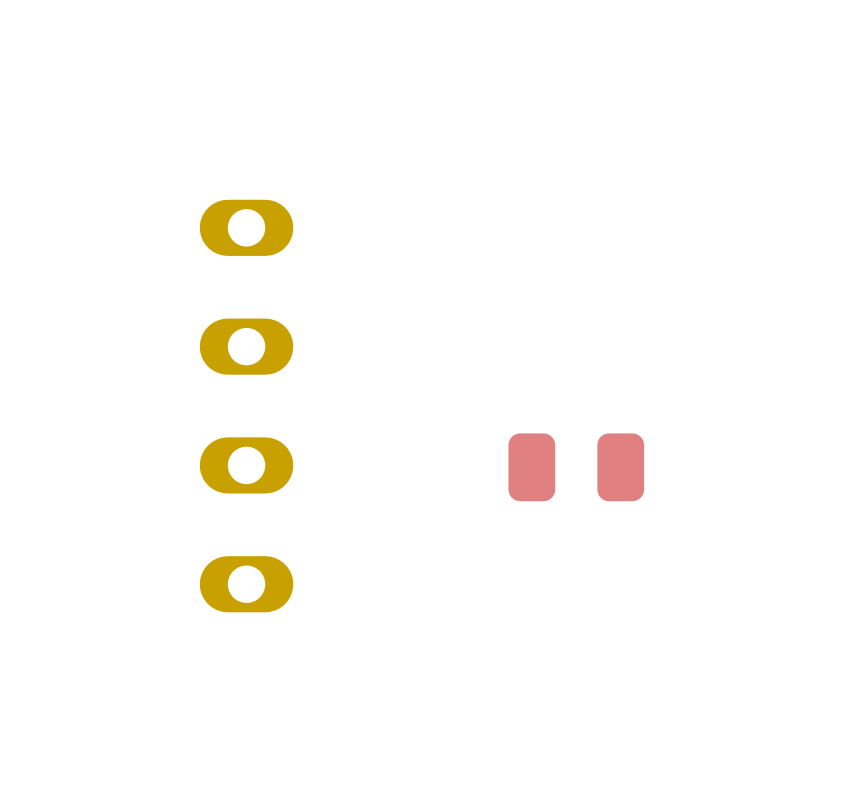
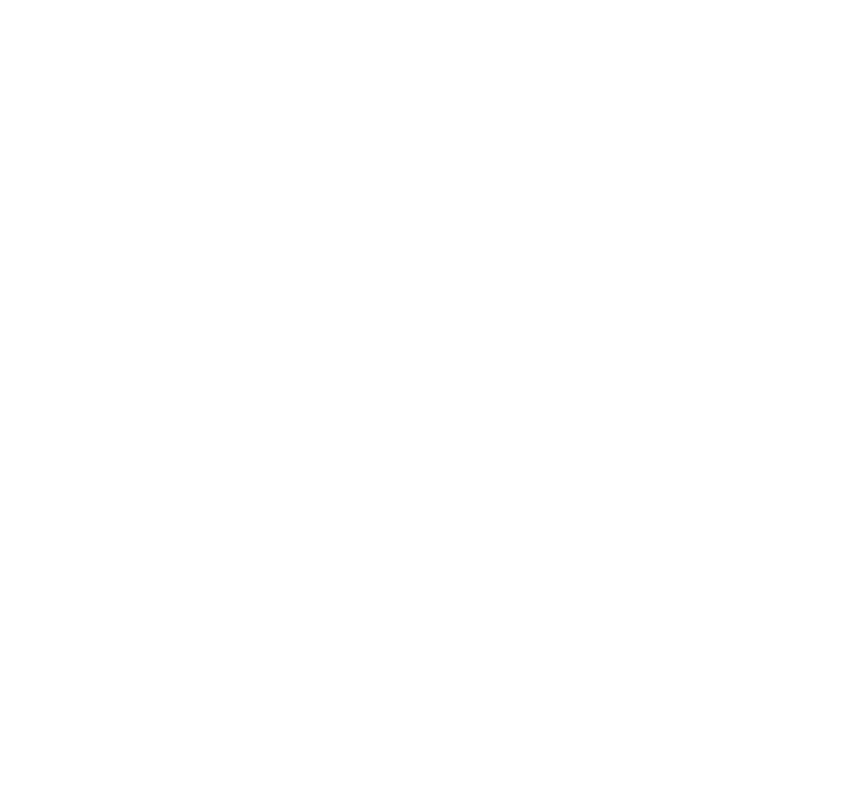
part: (246, 406) -> none
part: (576, 467) -> none

